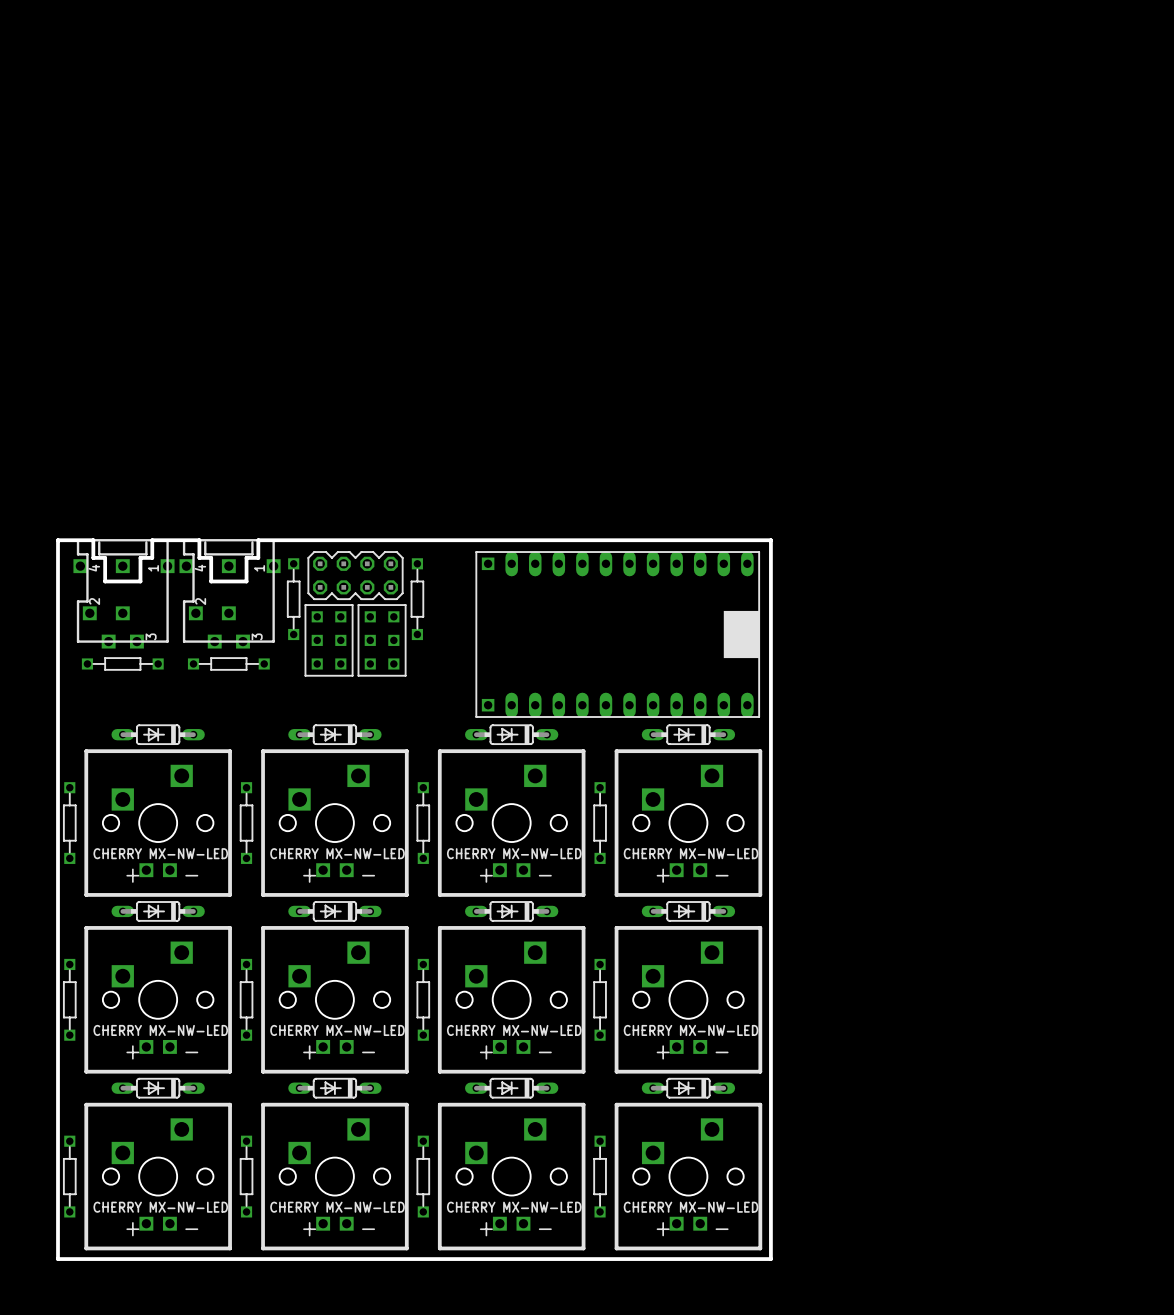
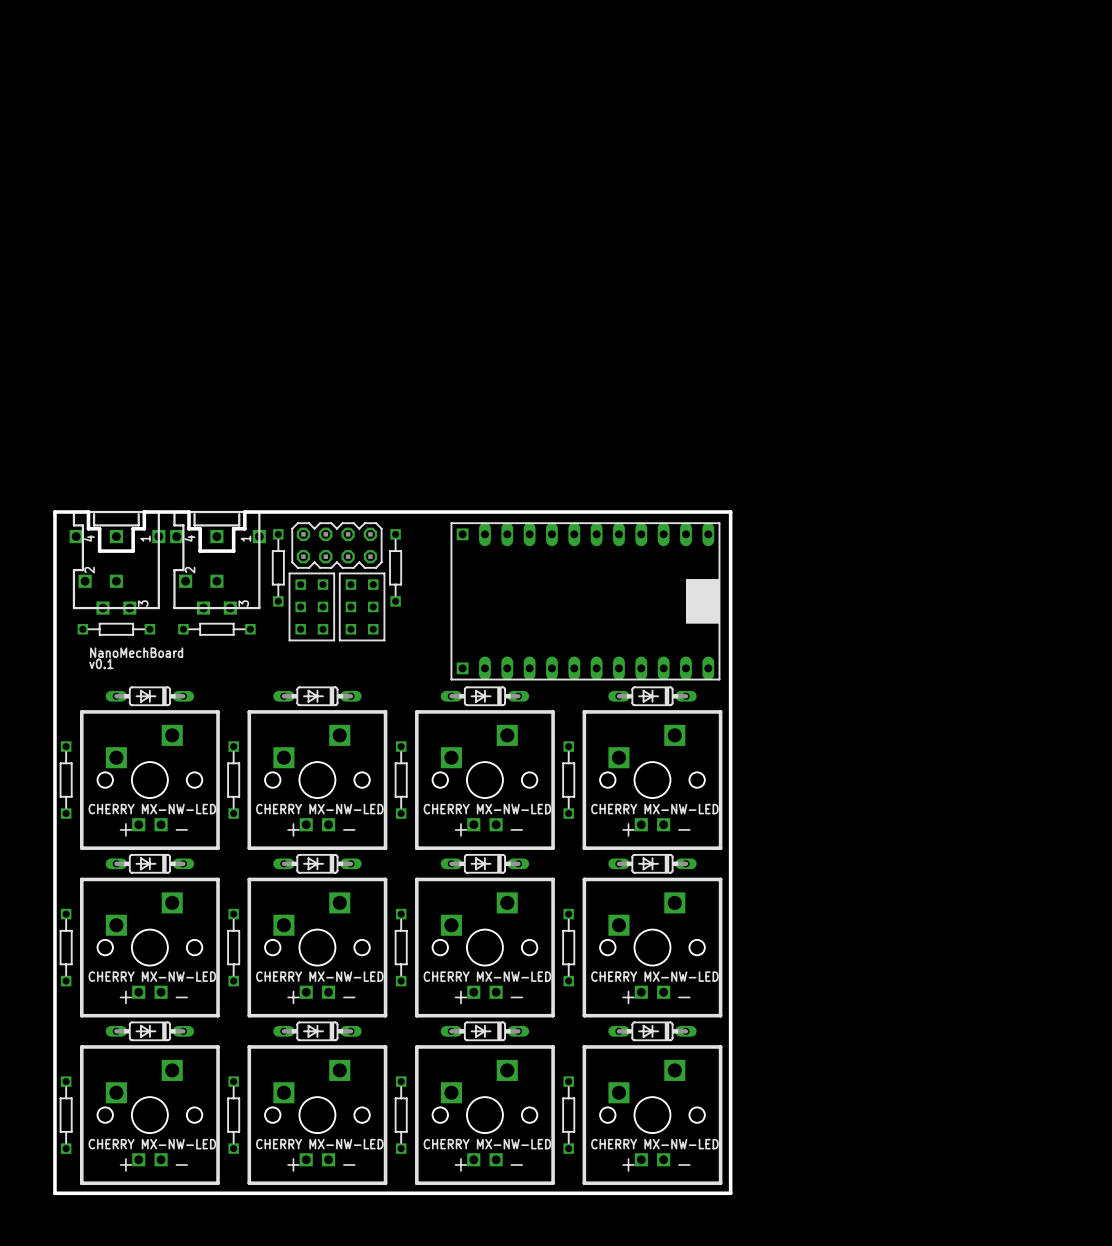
text: none -> NanoMechBoard (136, 652)
text: none -> v0.1 (101, 663)

